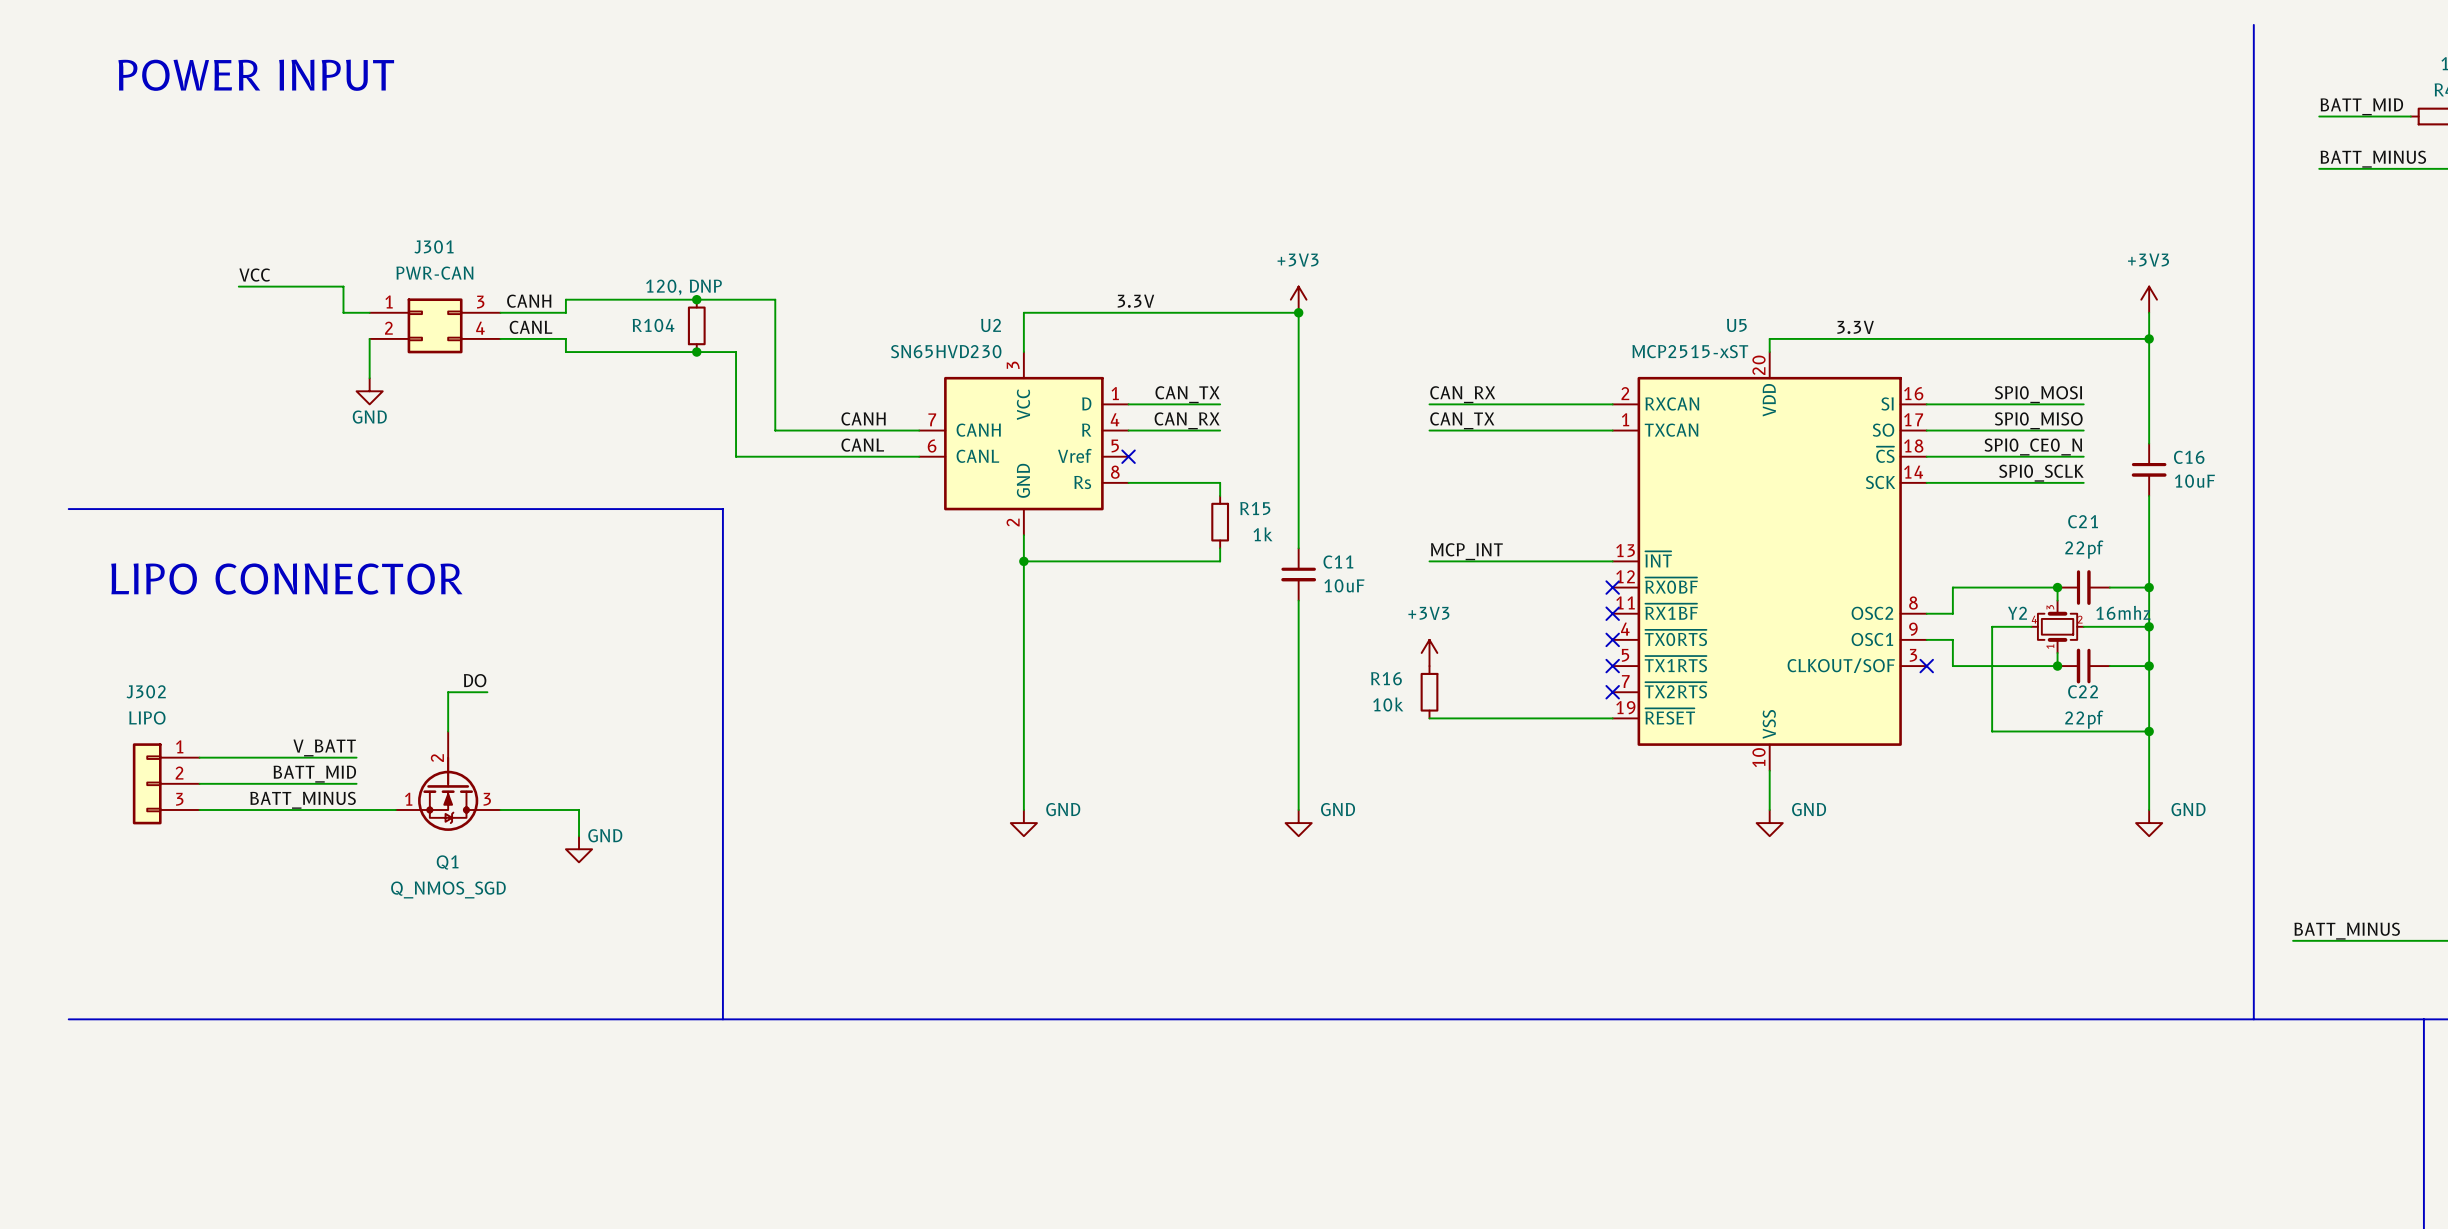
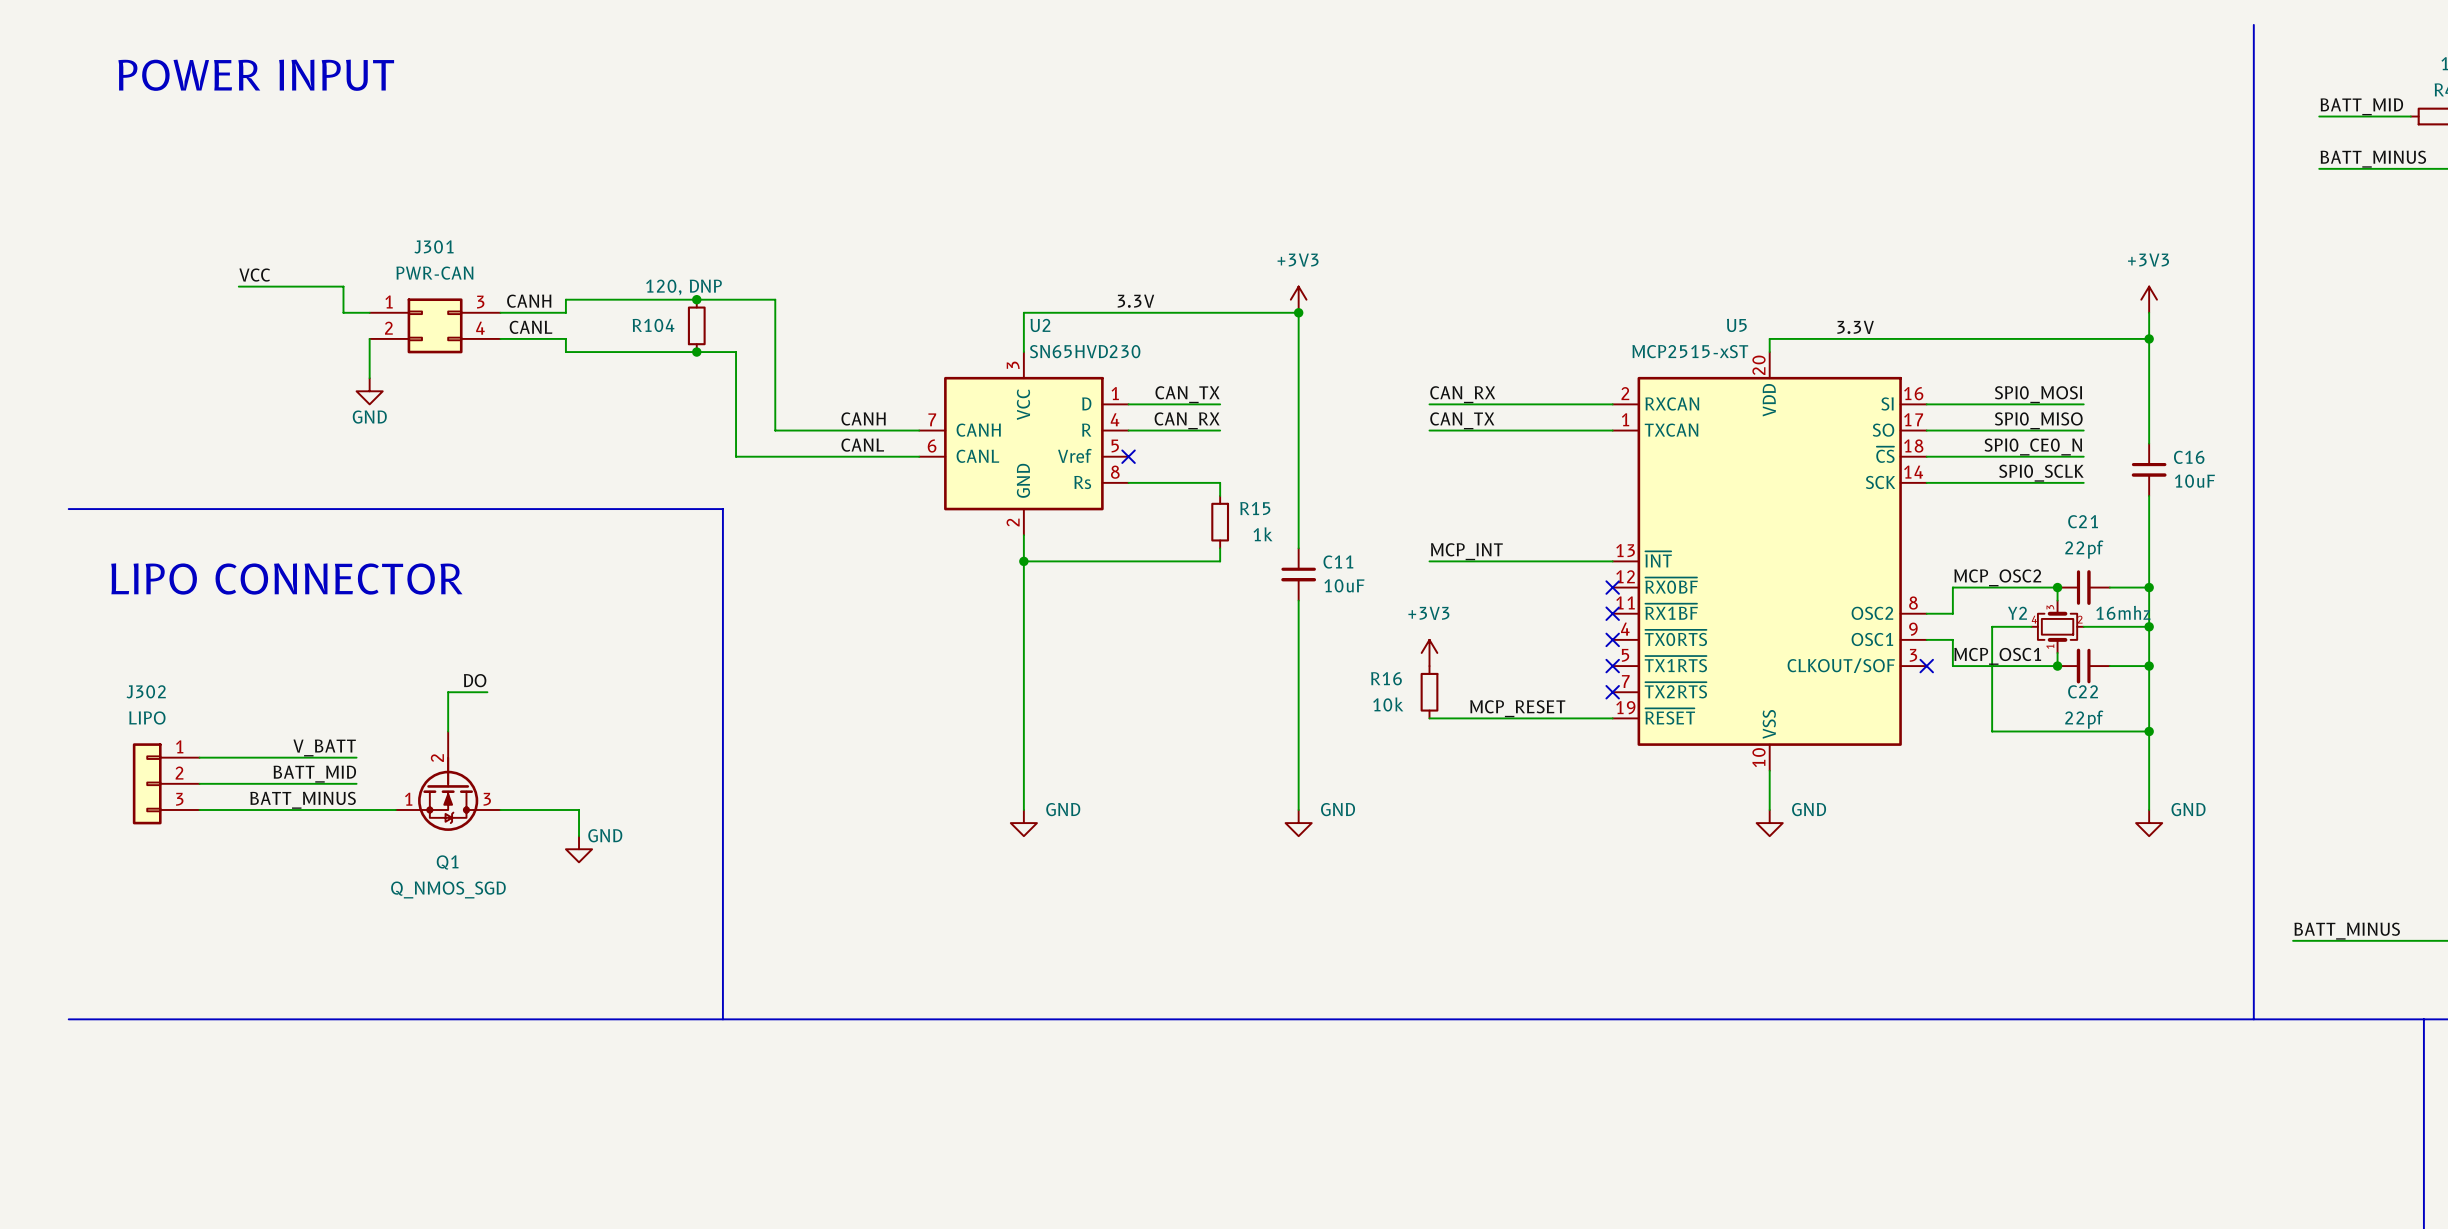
U2 name position: U2 (991, 325) -> U2 (1040, 325)
U2 value position: SN65HVD230 (946, 351) -> SN65HVD230 (1085, 351)
label: none -> MCP_OSC2 (1997, 577)
label: none -> MCP_OSC1 (1997, 656)
label: none -> MCP_RESET (1517, 708)

